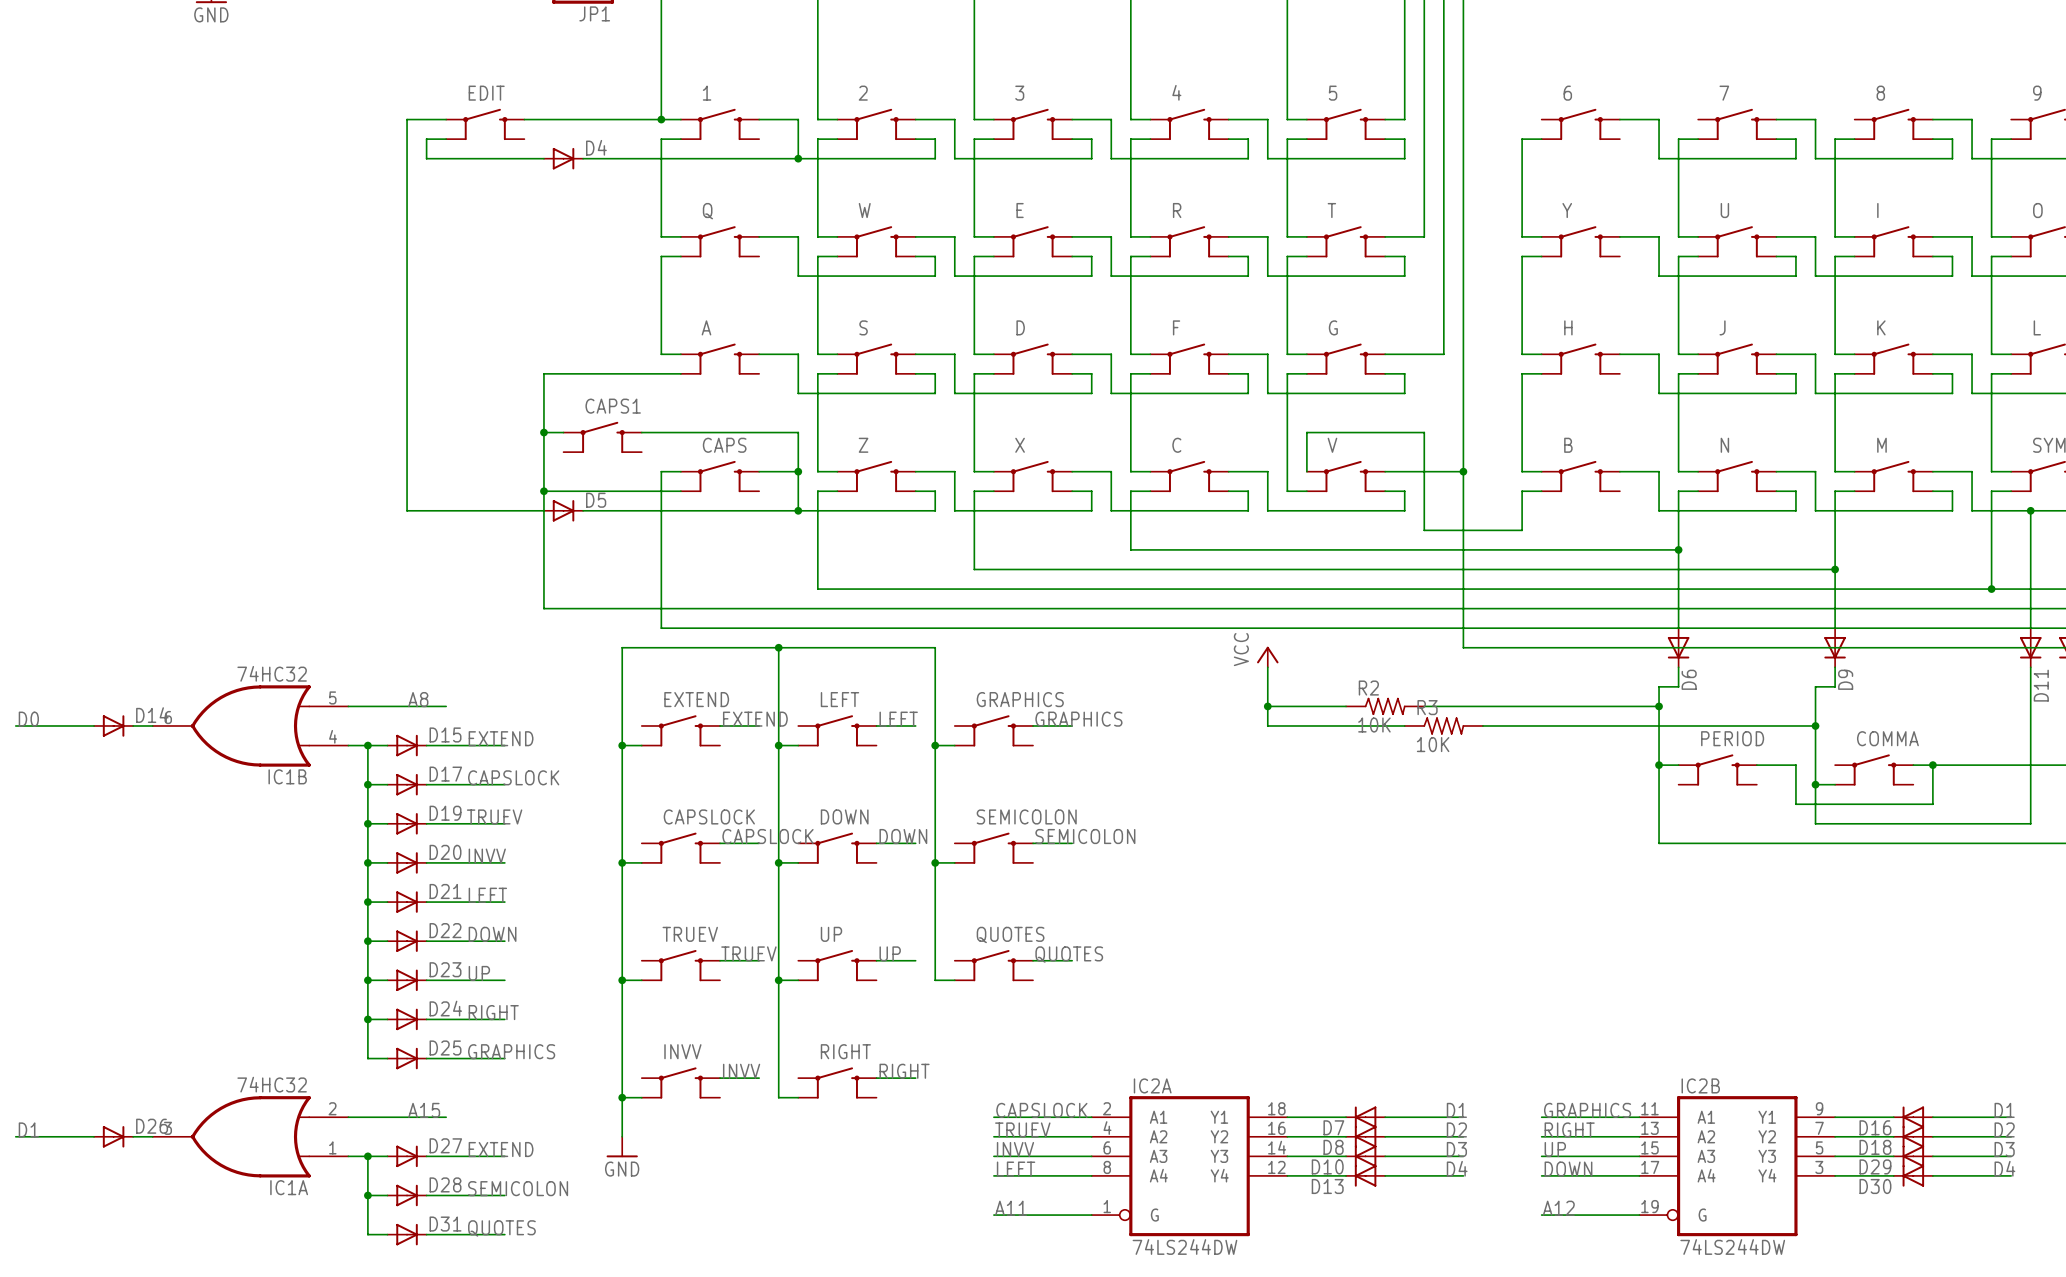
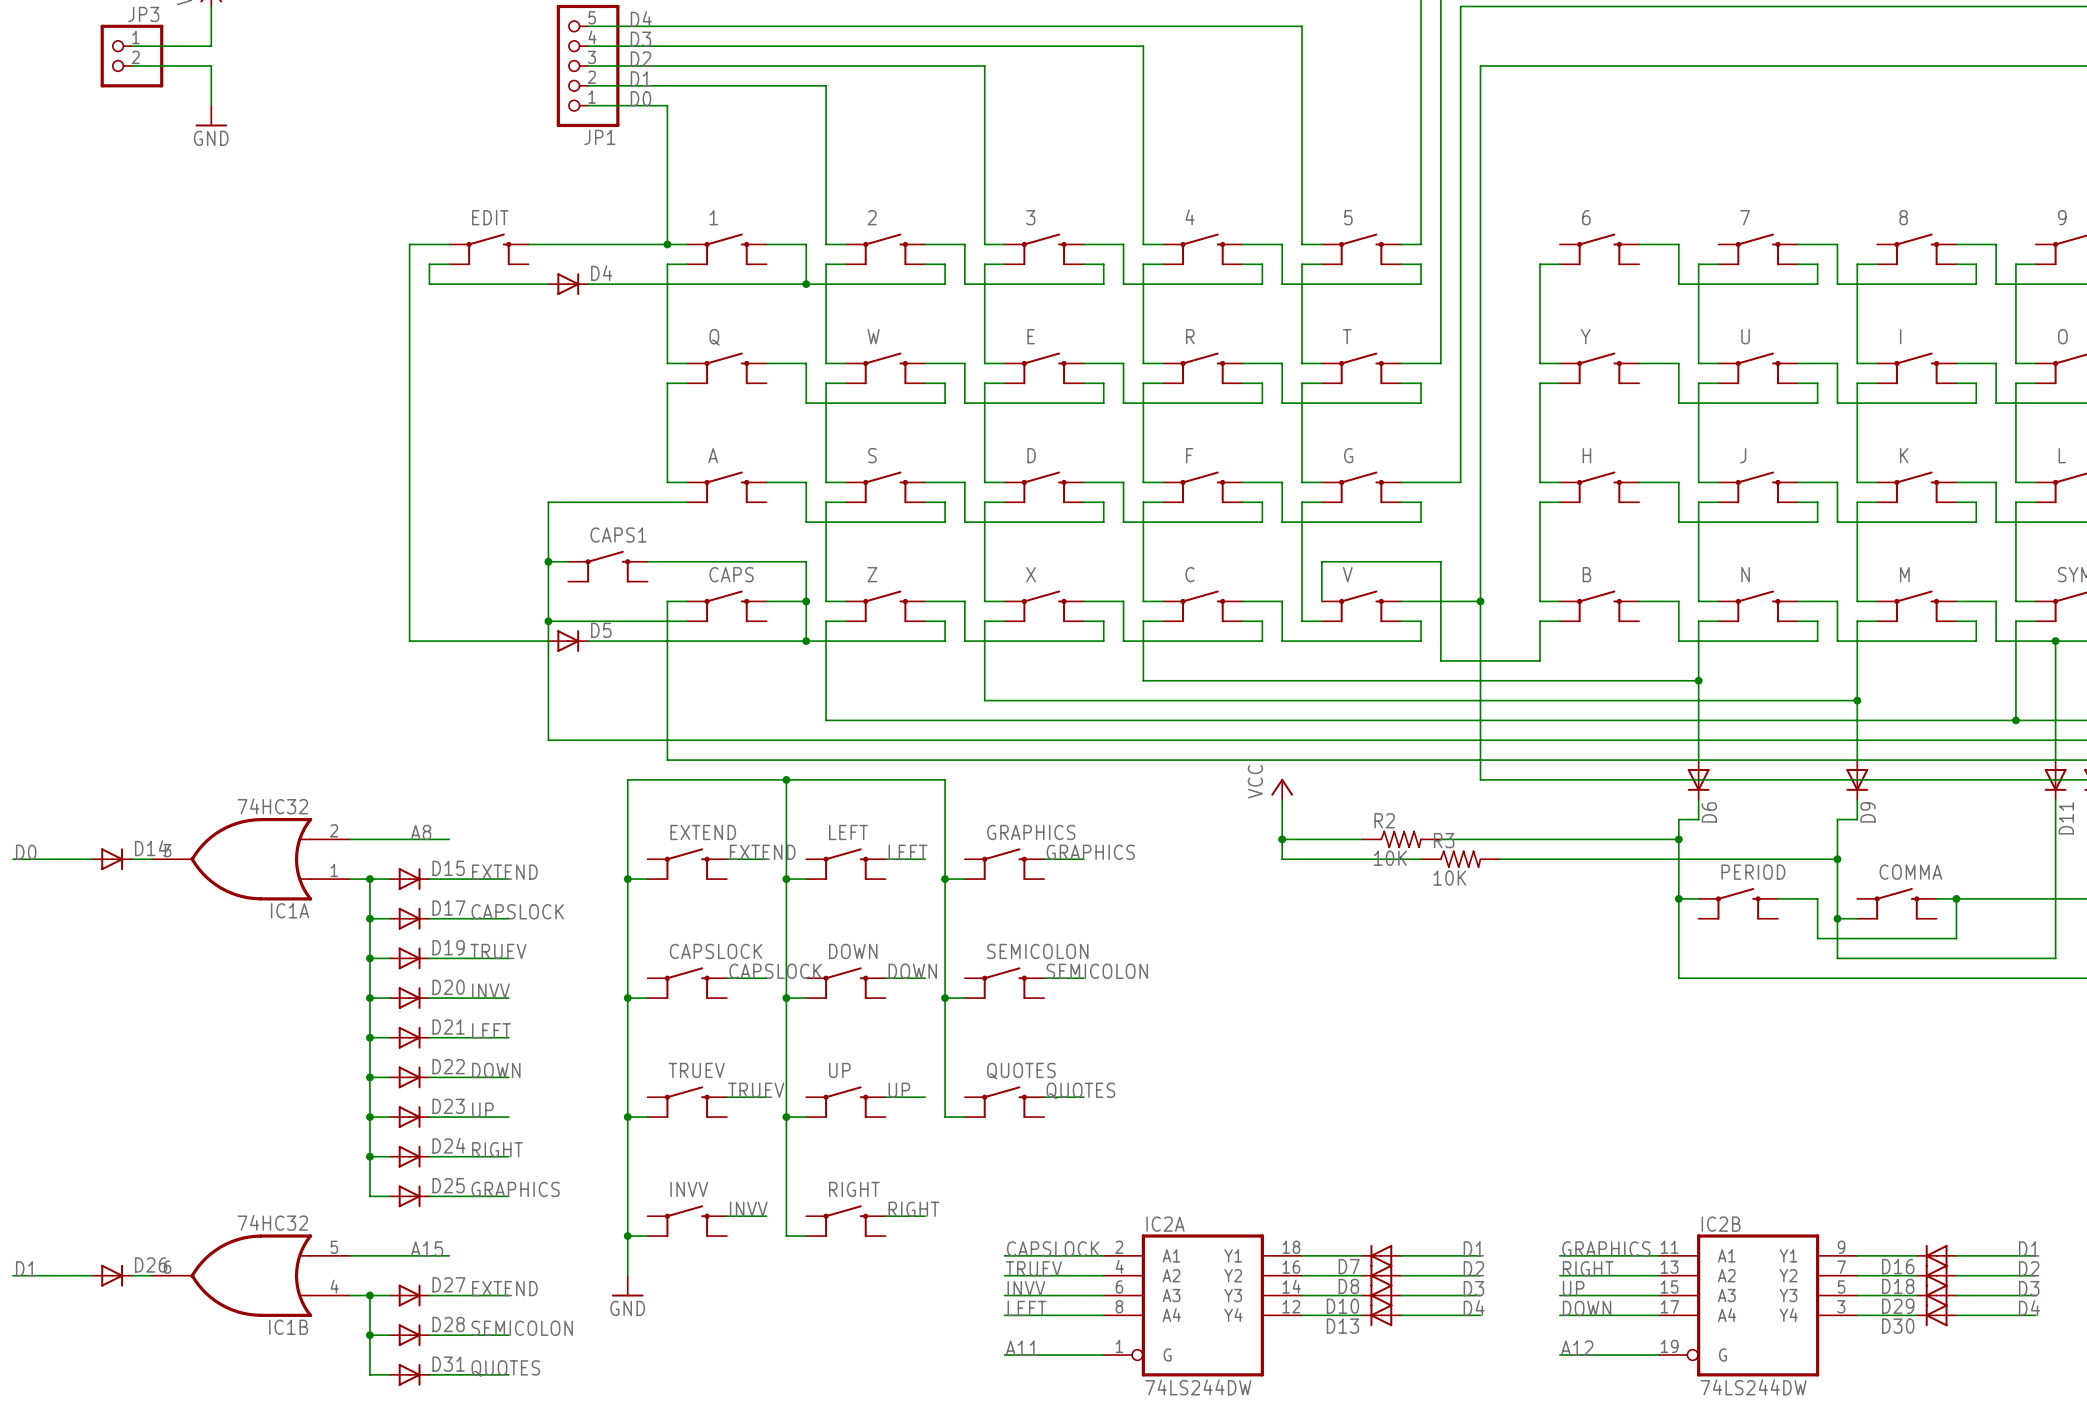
IC1B position: (250, 725) -> (250, 1275)
IC1A position: (250, 1136) -> (250, 859)

